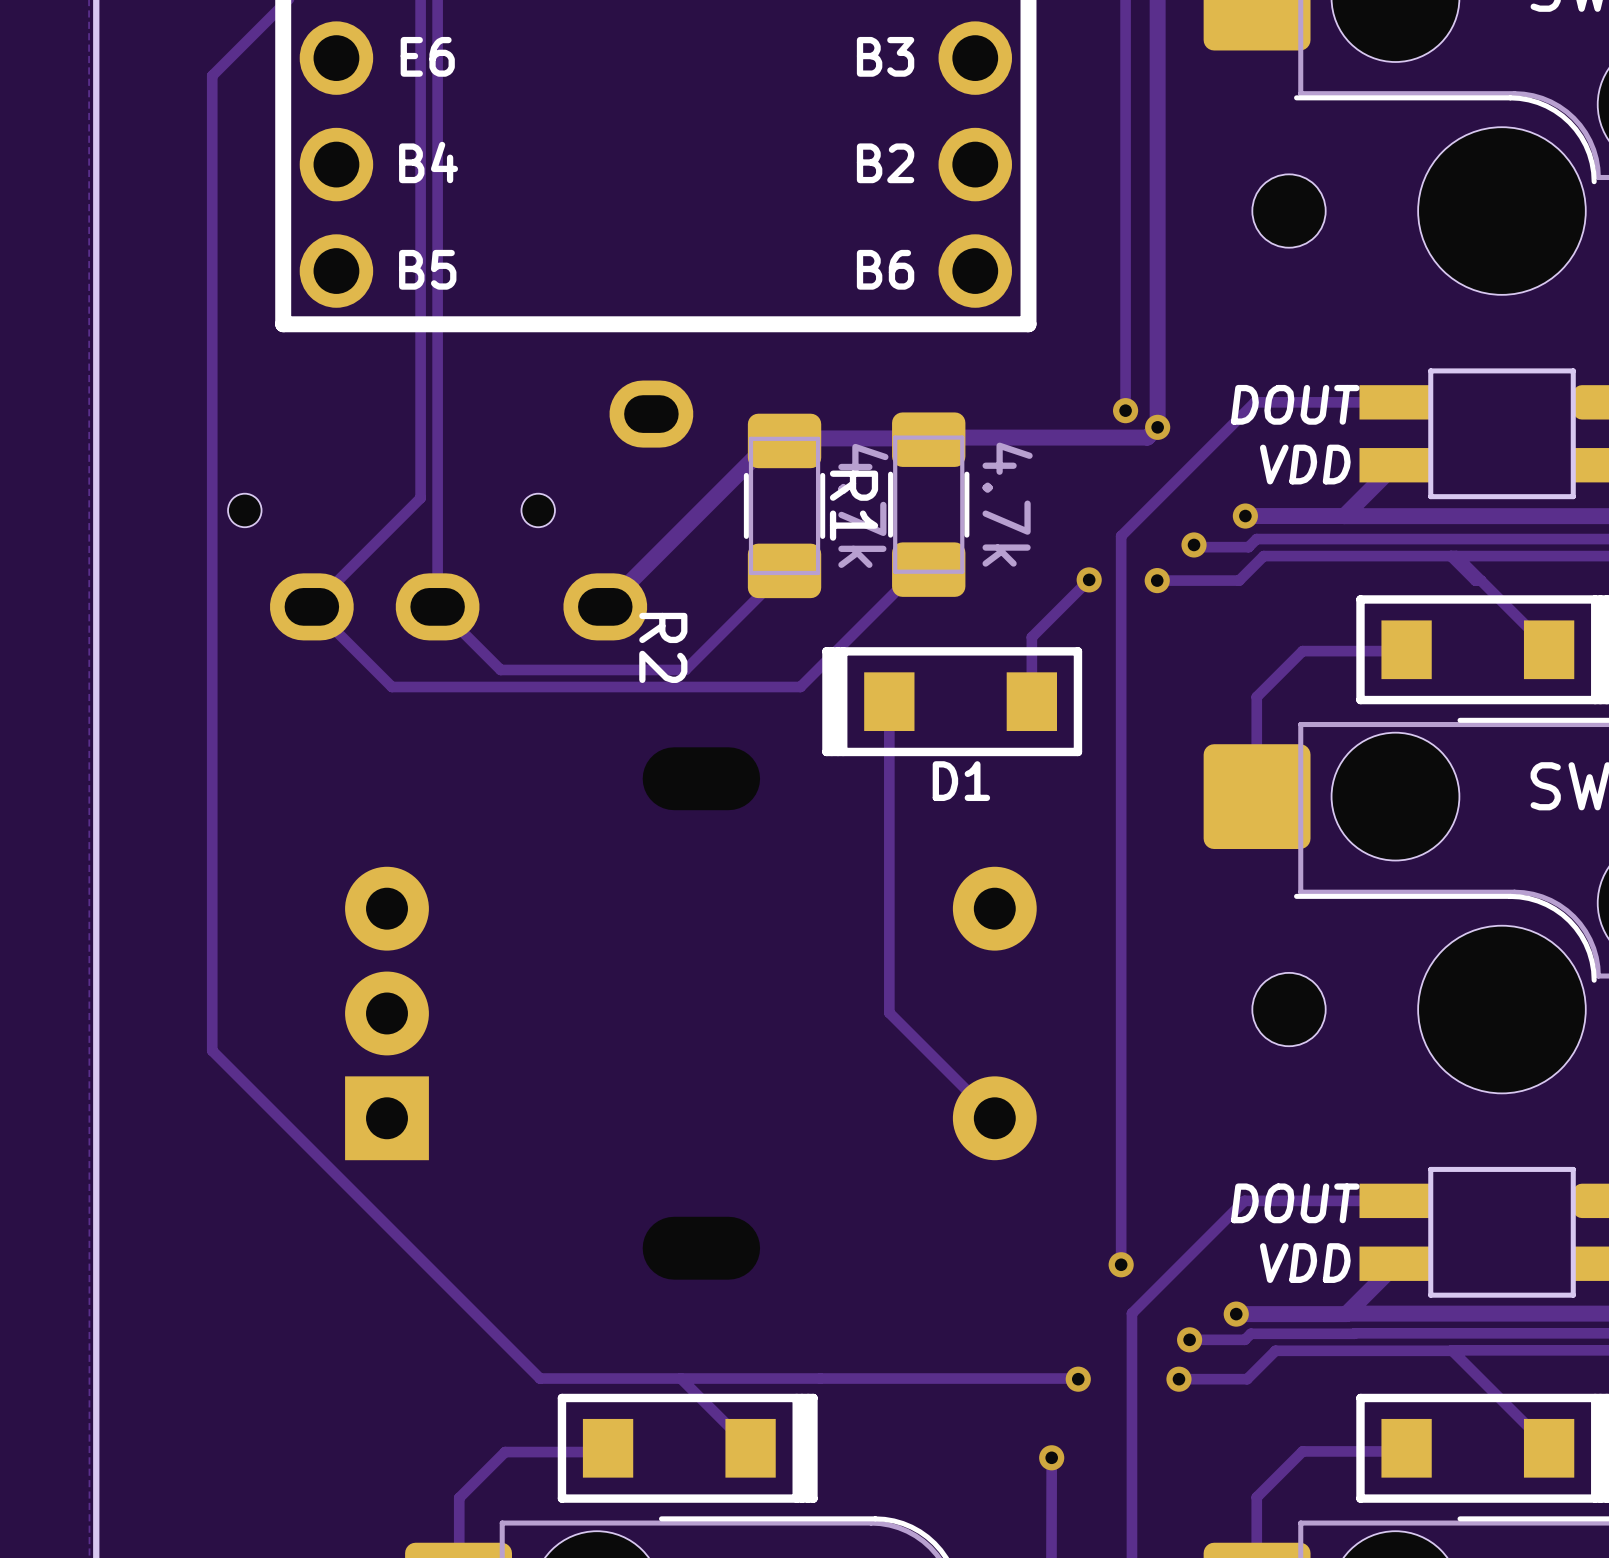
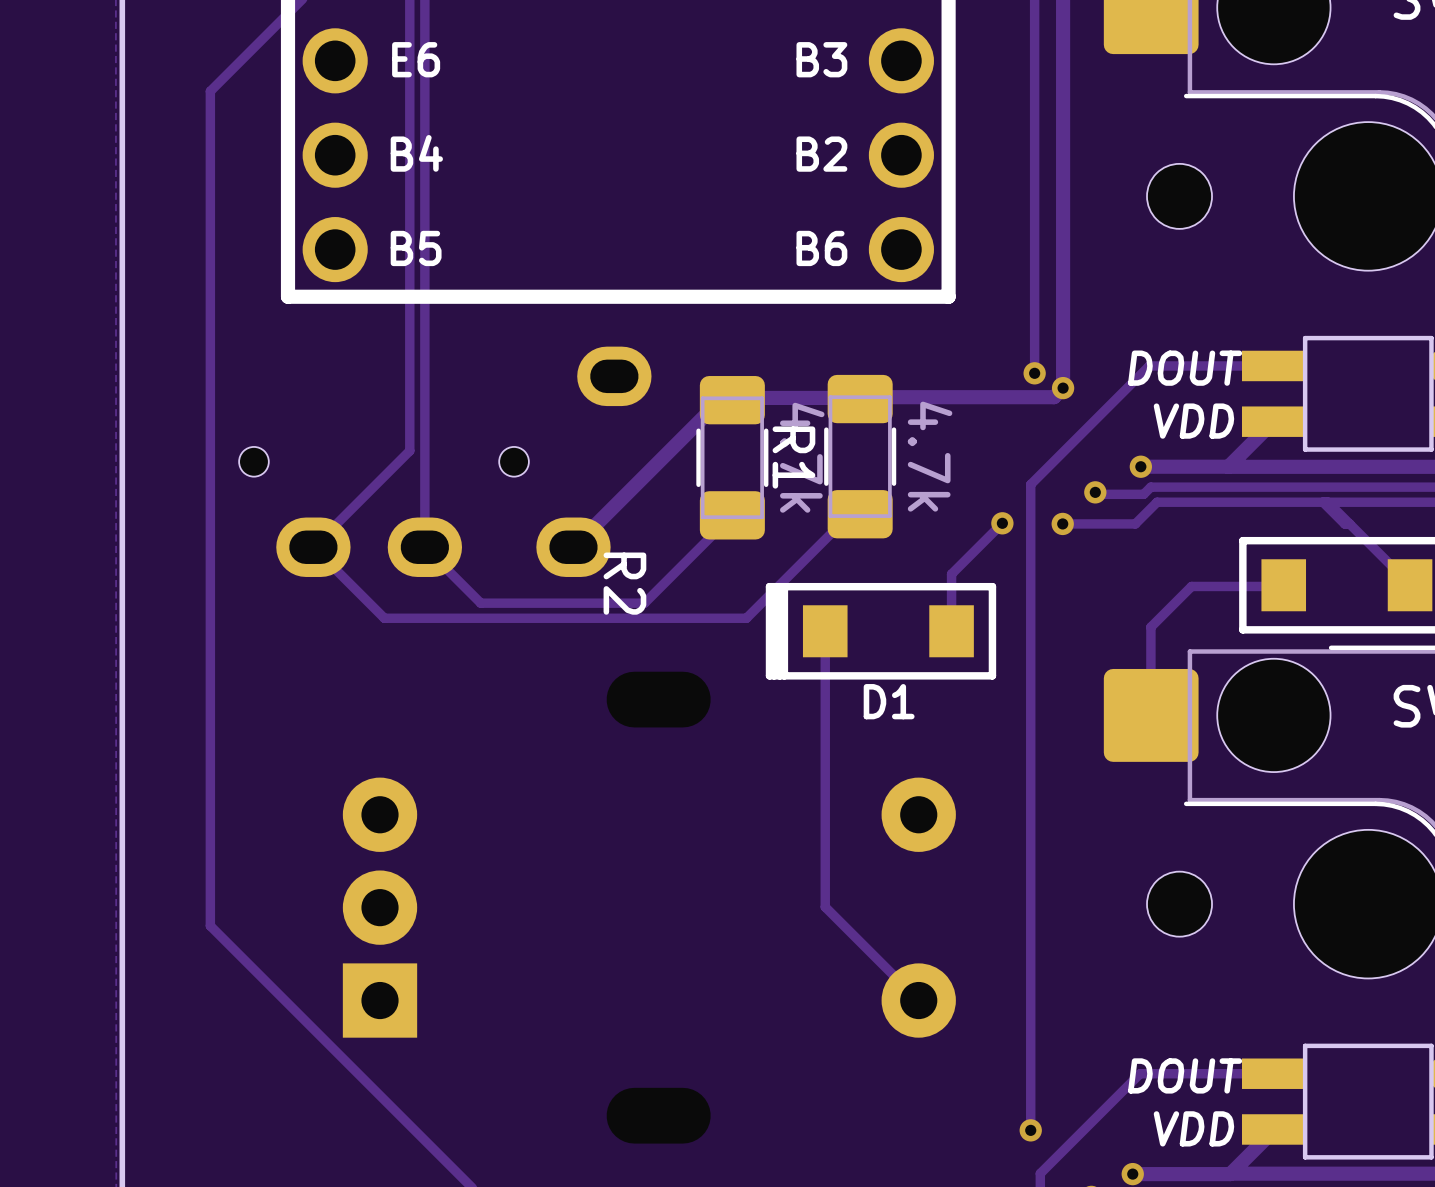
track: (212, 75) (212, 1050) -> (225, 76) (210, 91) (210, 925) (225, 940)

